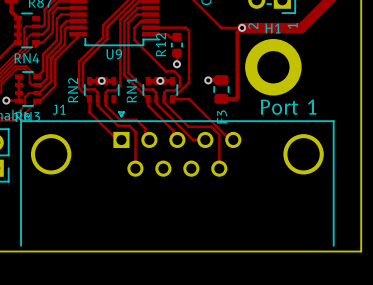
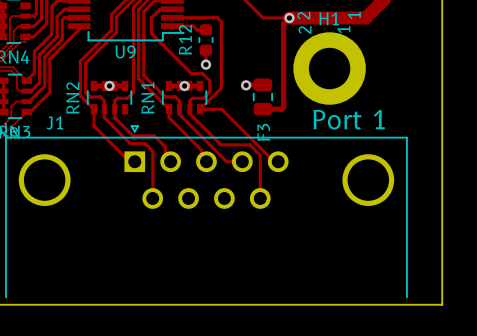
part text: none -> 2 (305, 29)
part text: none -> 1 (343, 29)

